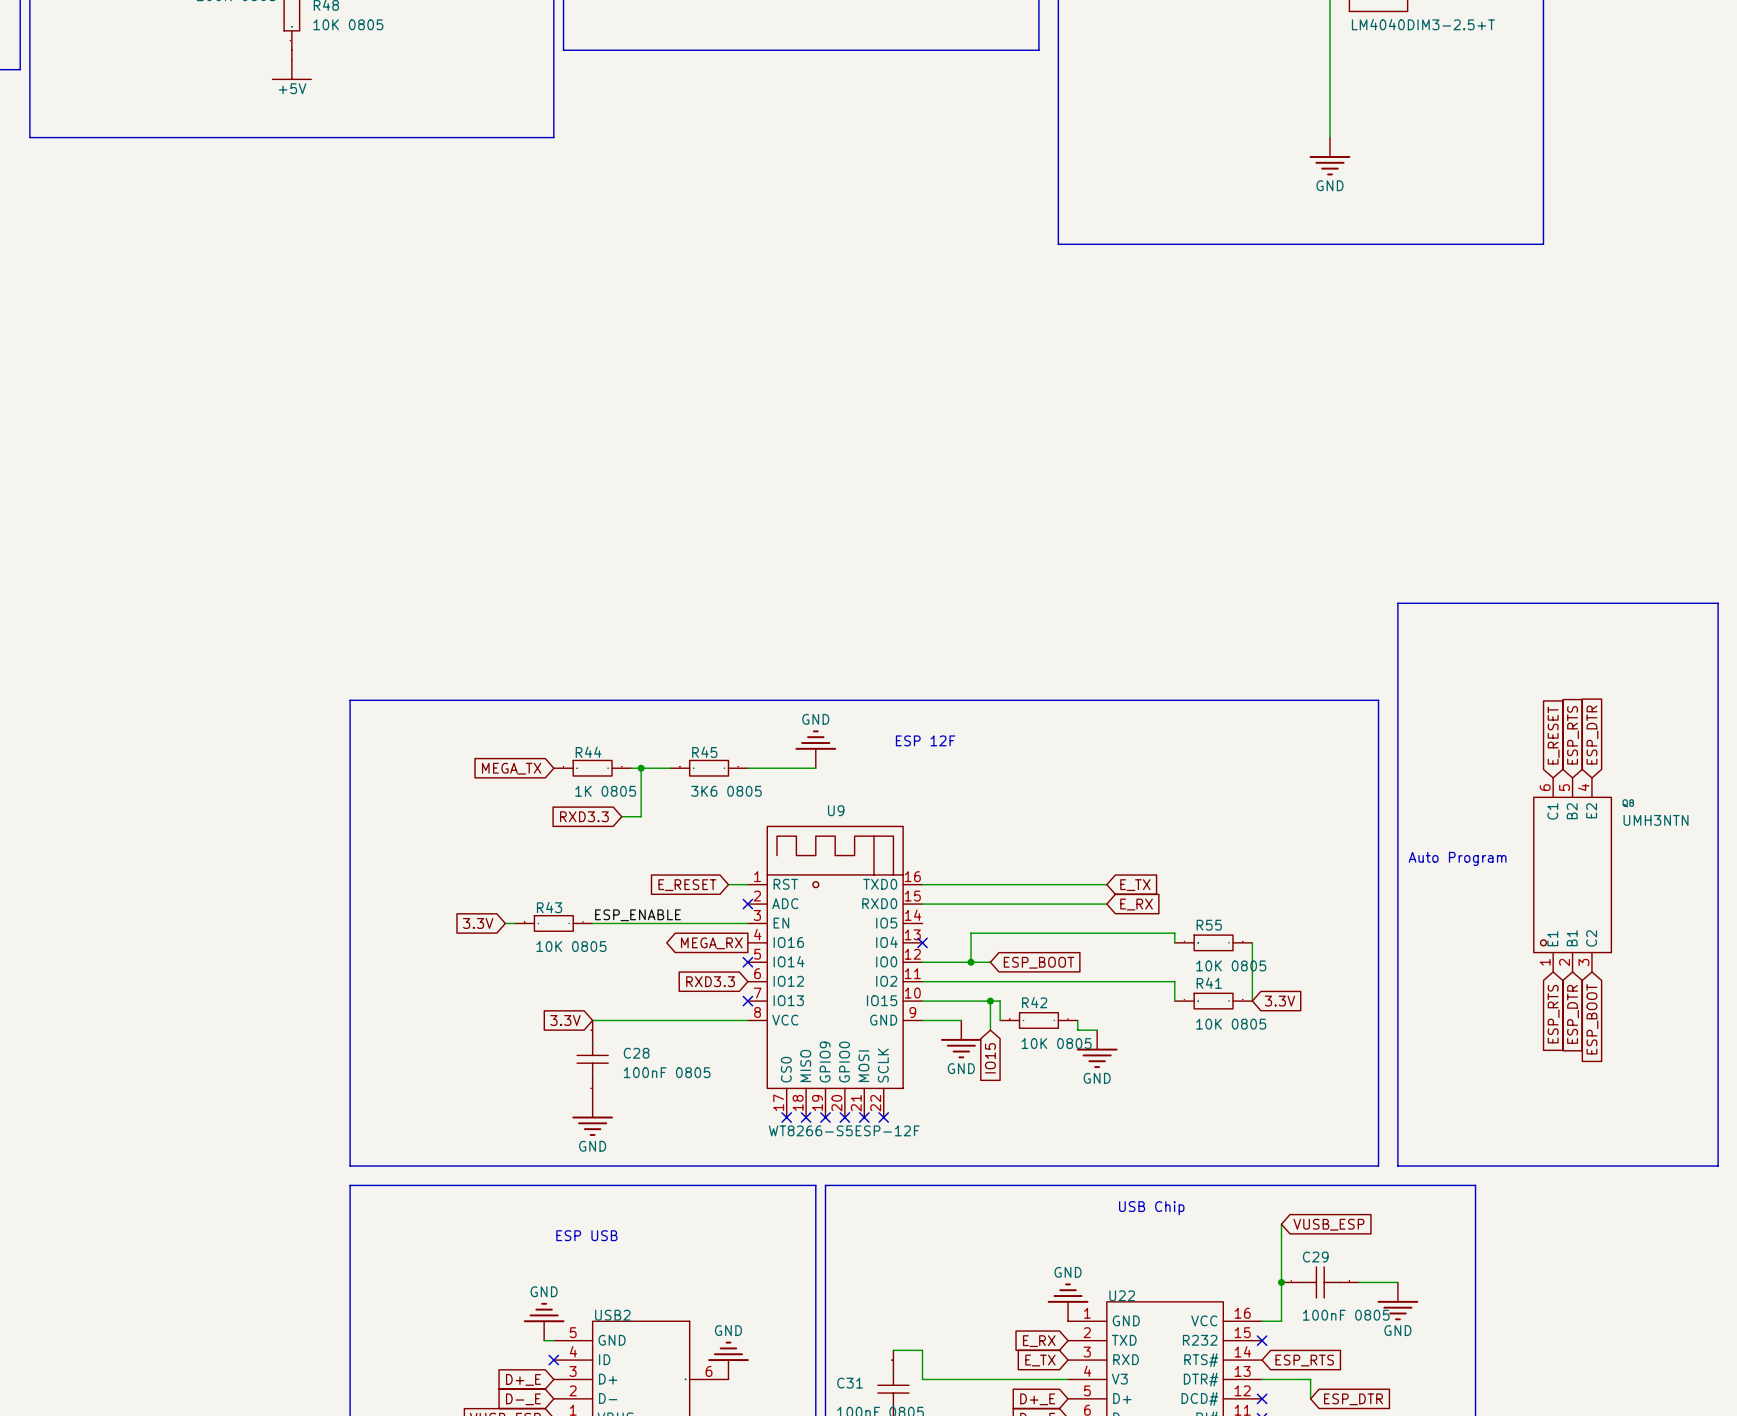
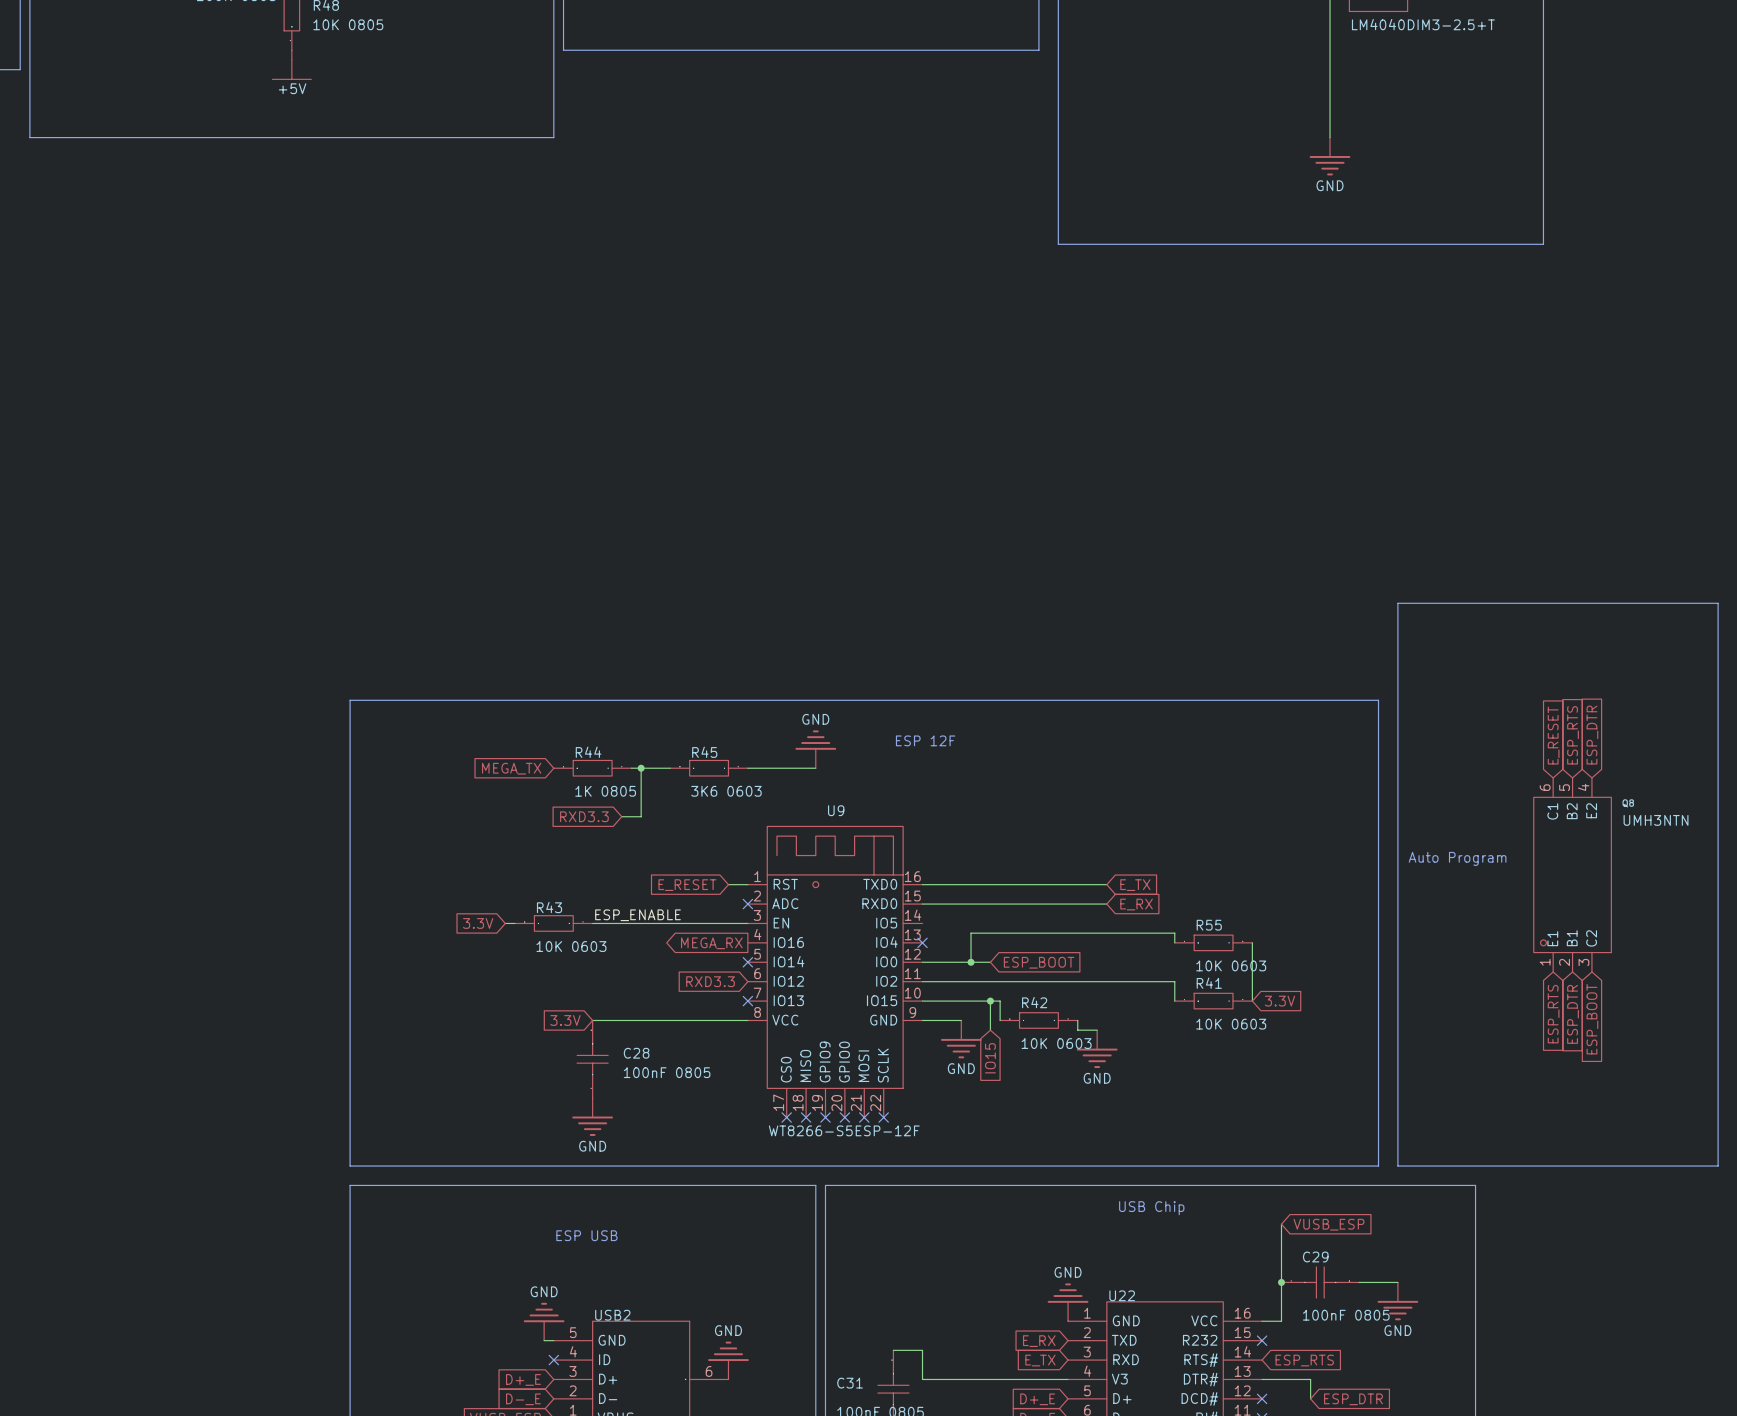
R45 value: 3K6 0805 (726, 791) -> 3K6 0603 (726, 791)
R43 value: 10K 0805 (571, 946) -> 10K 0603 (571, 946)
R55 value: 10K 0805 (1231, 965) -> 10K 0603 (1231, 965)
R41 value: 10K 0805 (1231, 1024) -> 10K 0603 (1231, 1024)
R42 value: 10K 0805 (1056, 1043) -> 10K 0603 (1056, 1043)

